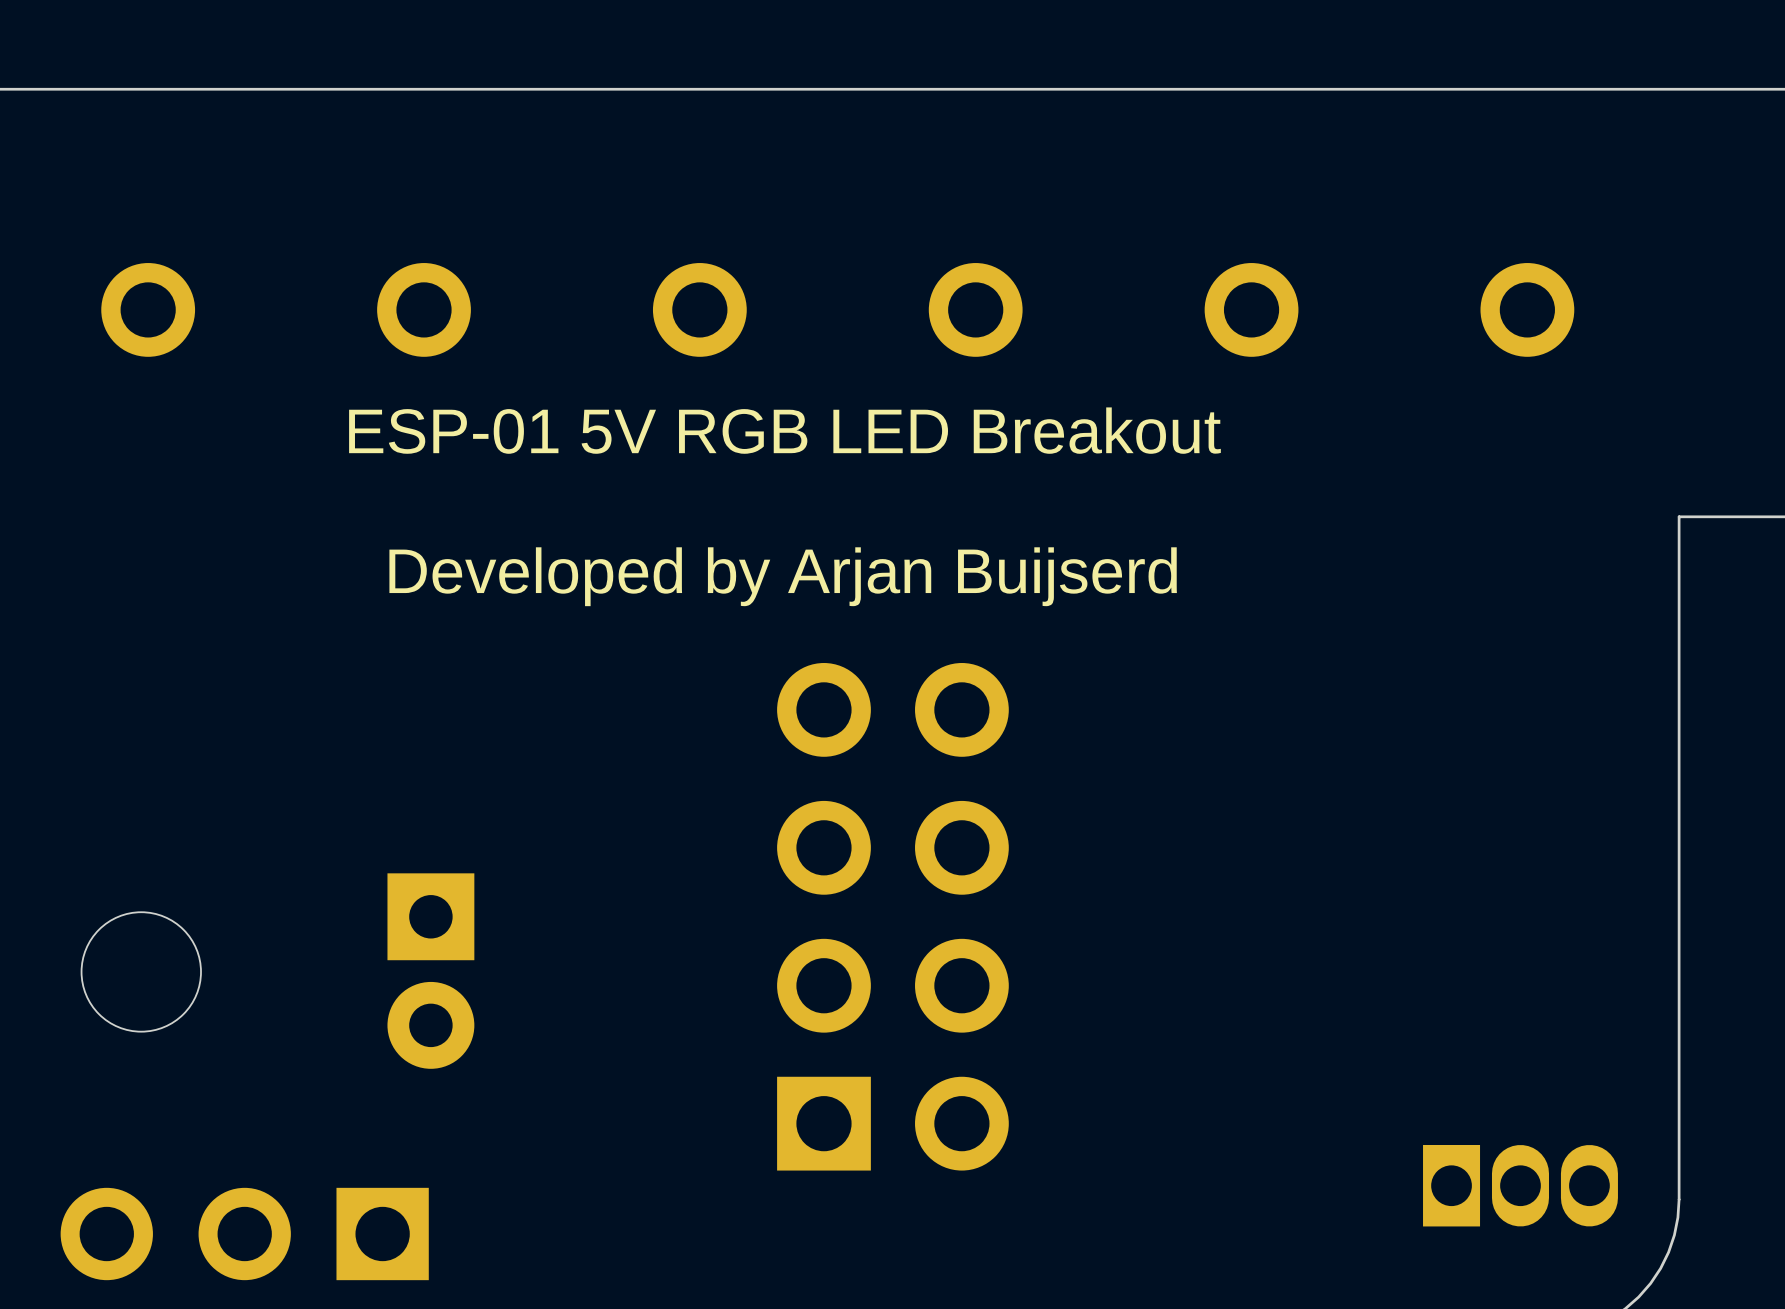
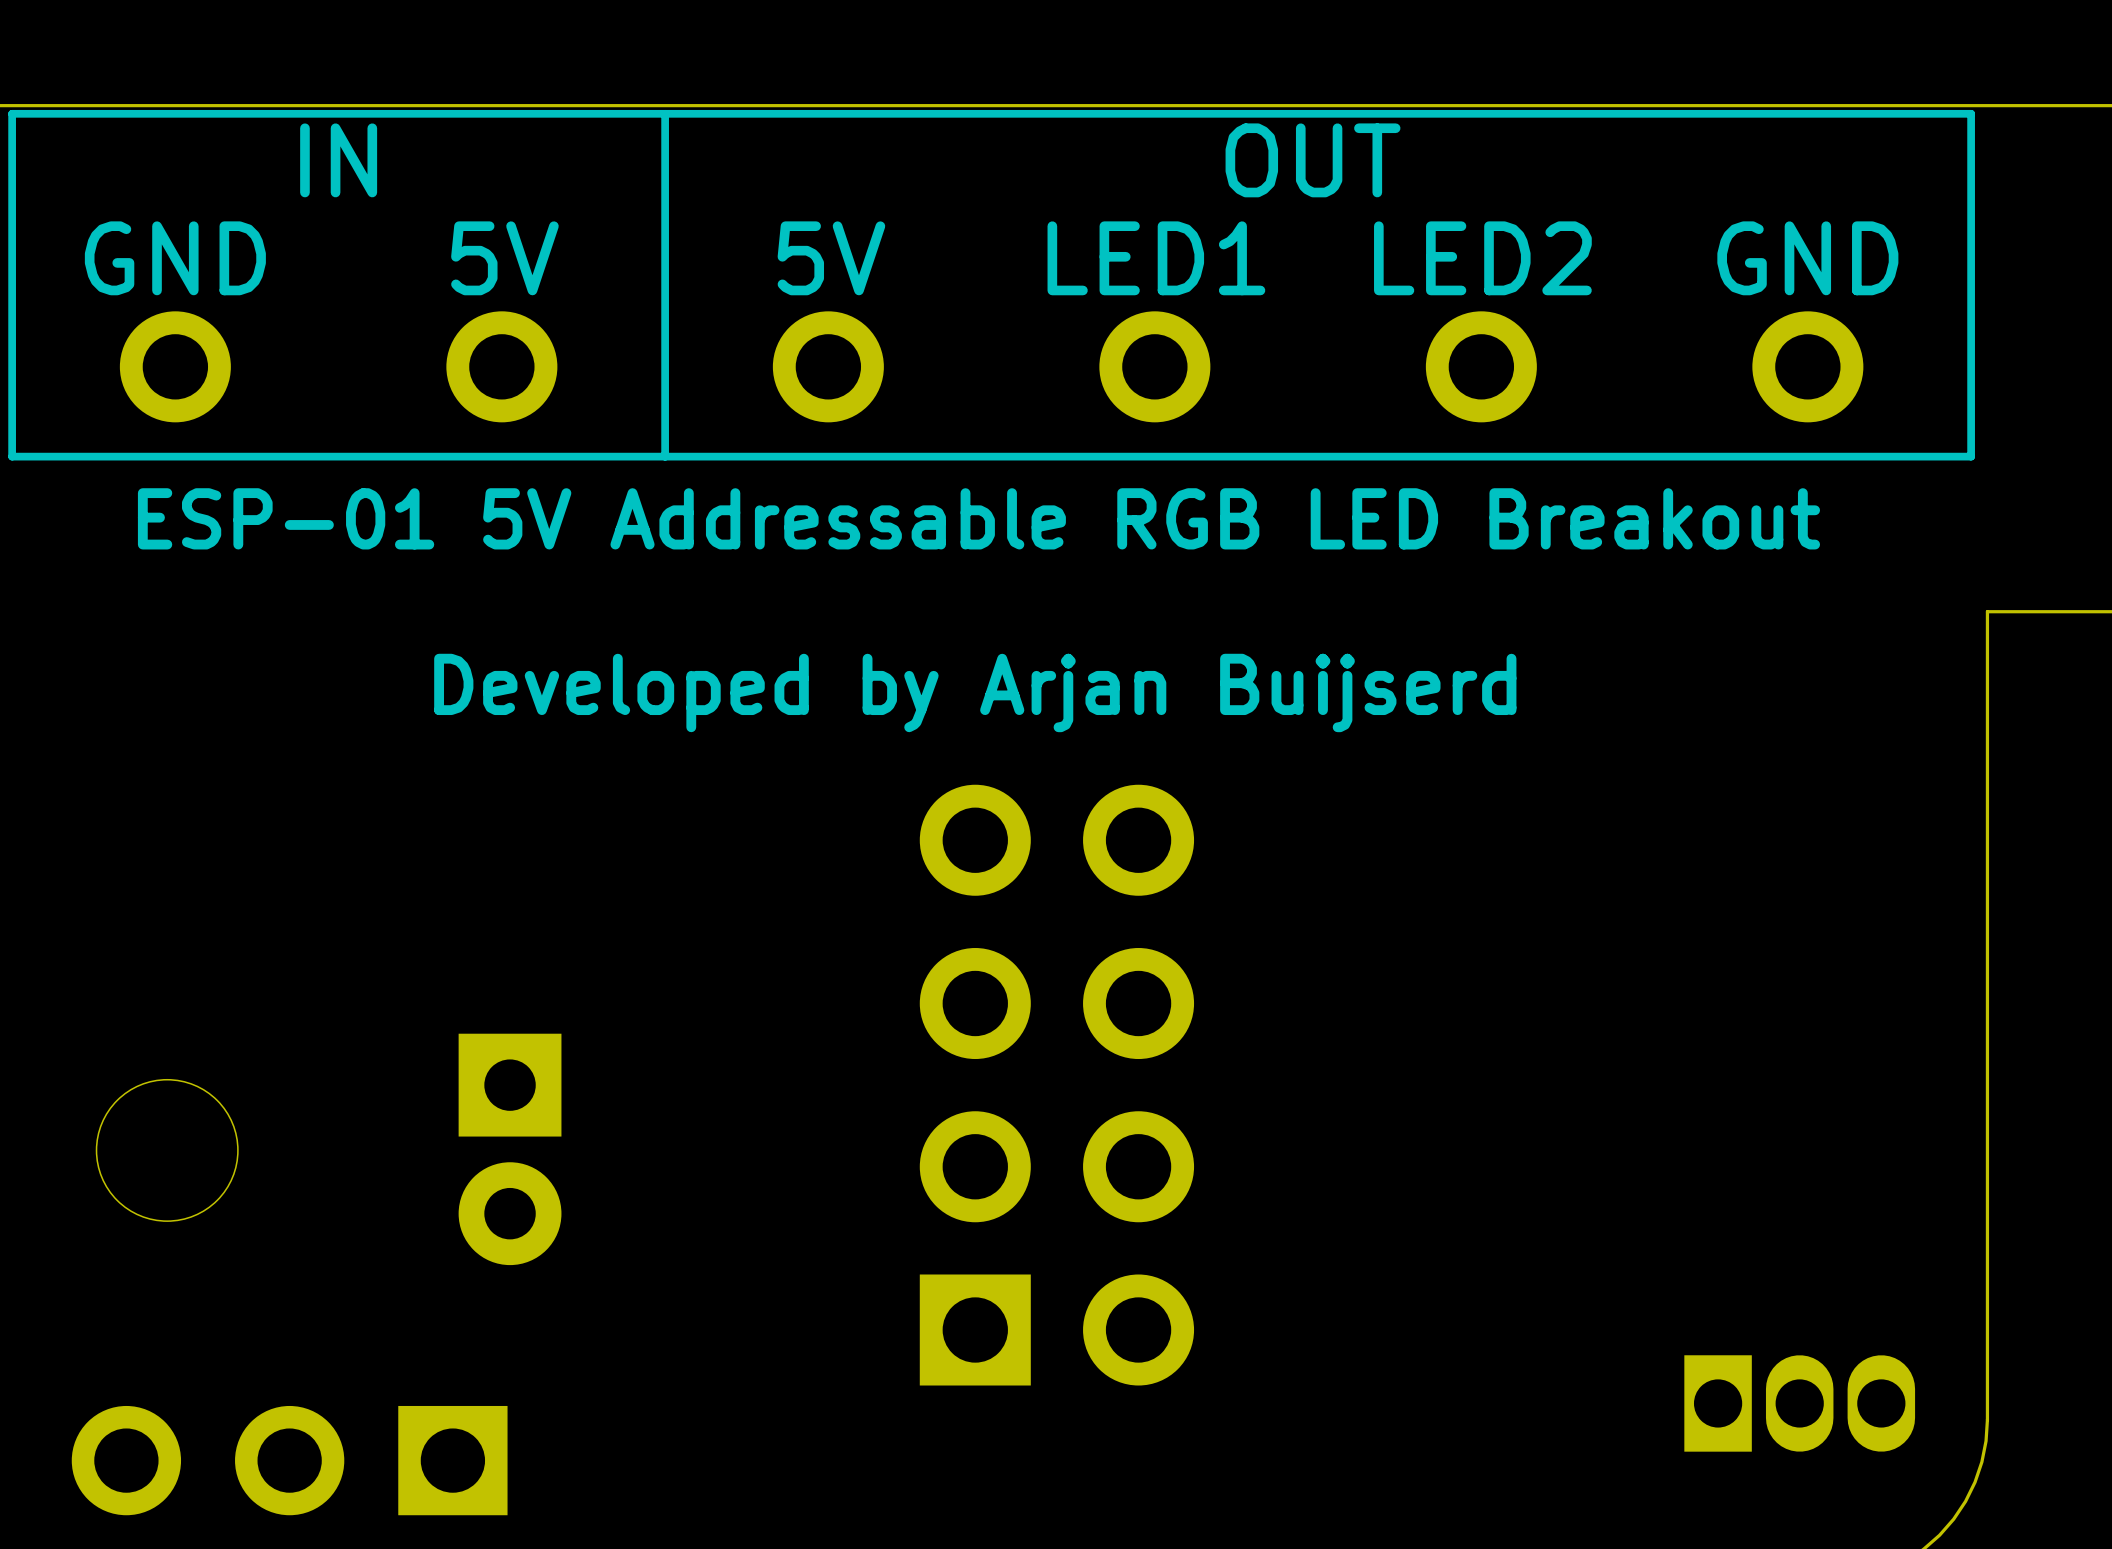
line: none -> (665, 113) (665, 456)
line: none -> (1971, 113) (1971, 456) (12, 456) (12, 113) (1971, 113)
text: none -> IN (338, 160)
text: none -> OUT (1313, 160)
text: none -> LED2 (1482, 258)
text: none -> GND (175, 258)
text: none -> 5V (504, 258)
text: none -> 5V (831, 258)
text: none -> LED1 (1156, 258)
text: none -> GND (1807, 258)
text: ESP-01 5V RGB LED Breakout (784, 430) -> ESP-01 5V Addressable RGB LED Breakout (978, 518)
text position: Developed by Arjan Buijserd (783, 576) -> Developed by Arjan Buijserd (975, 692)

